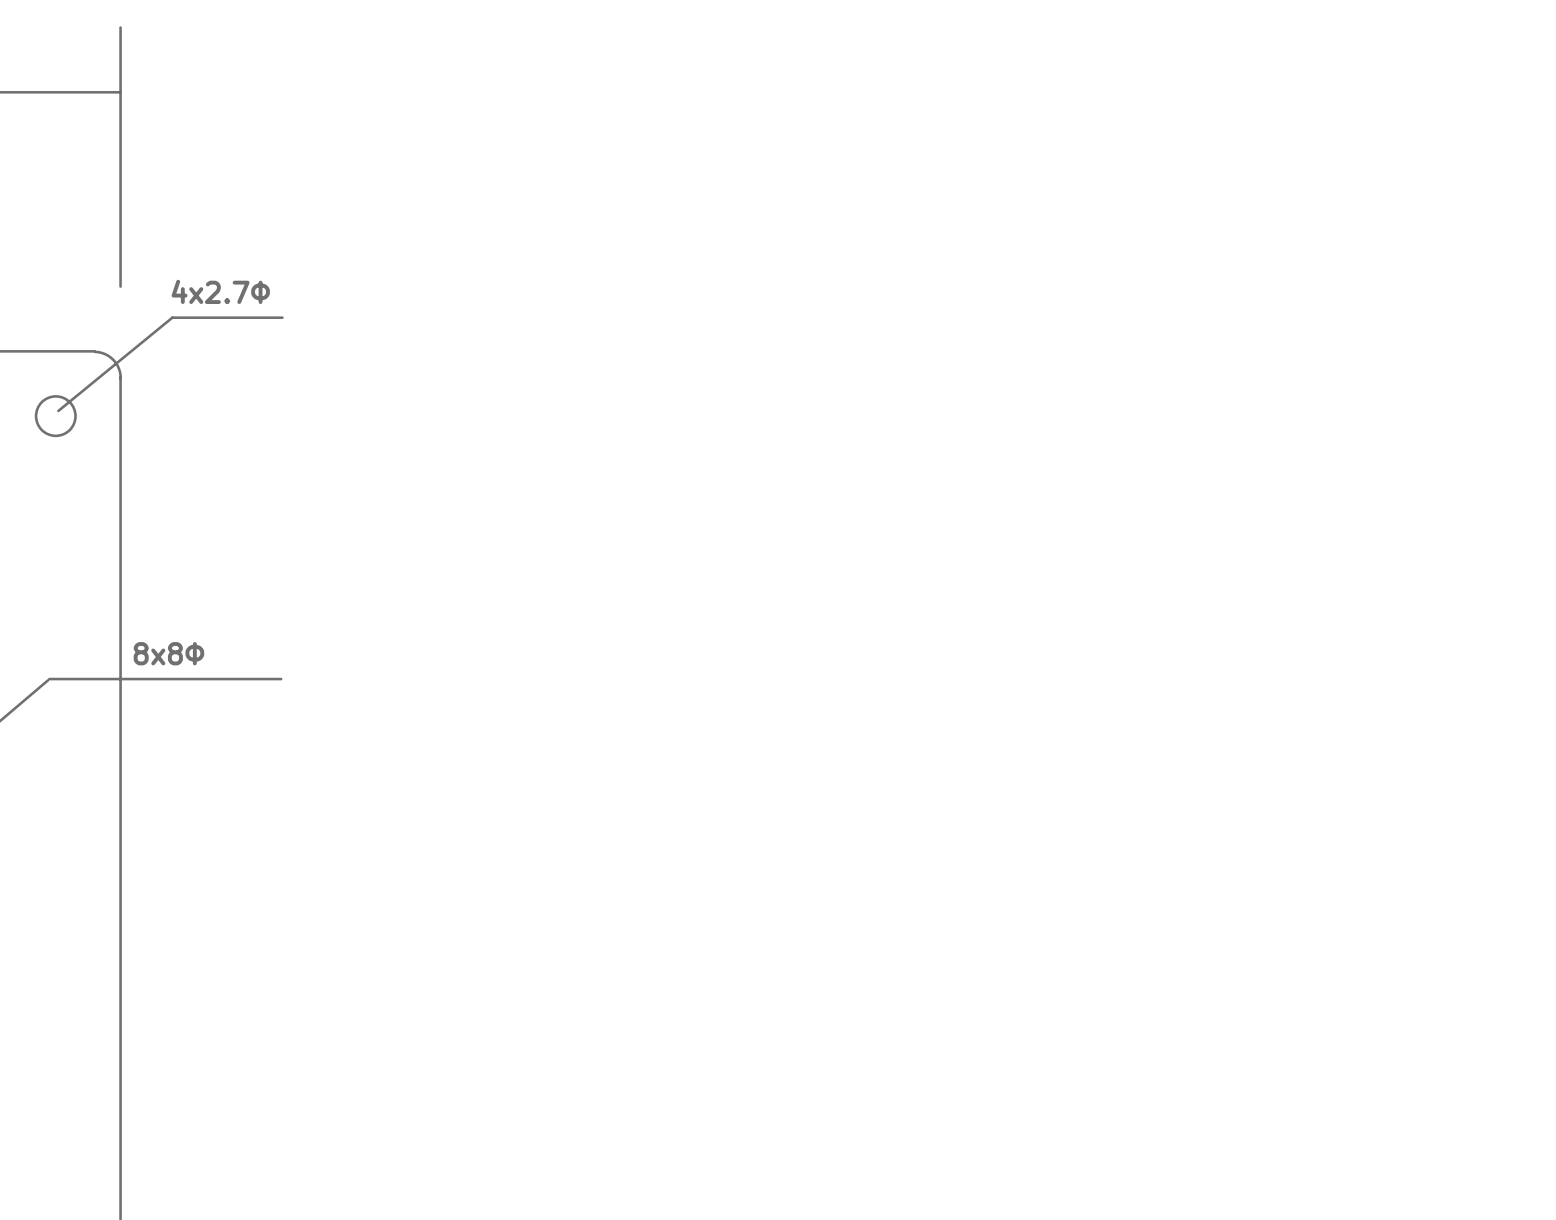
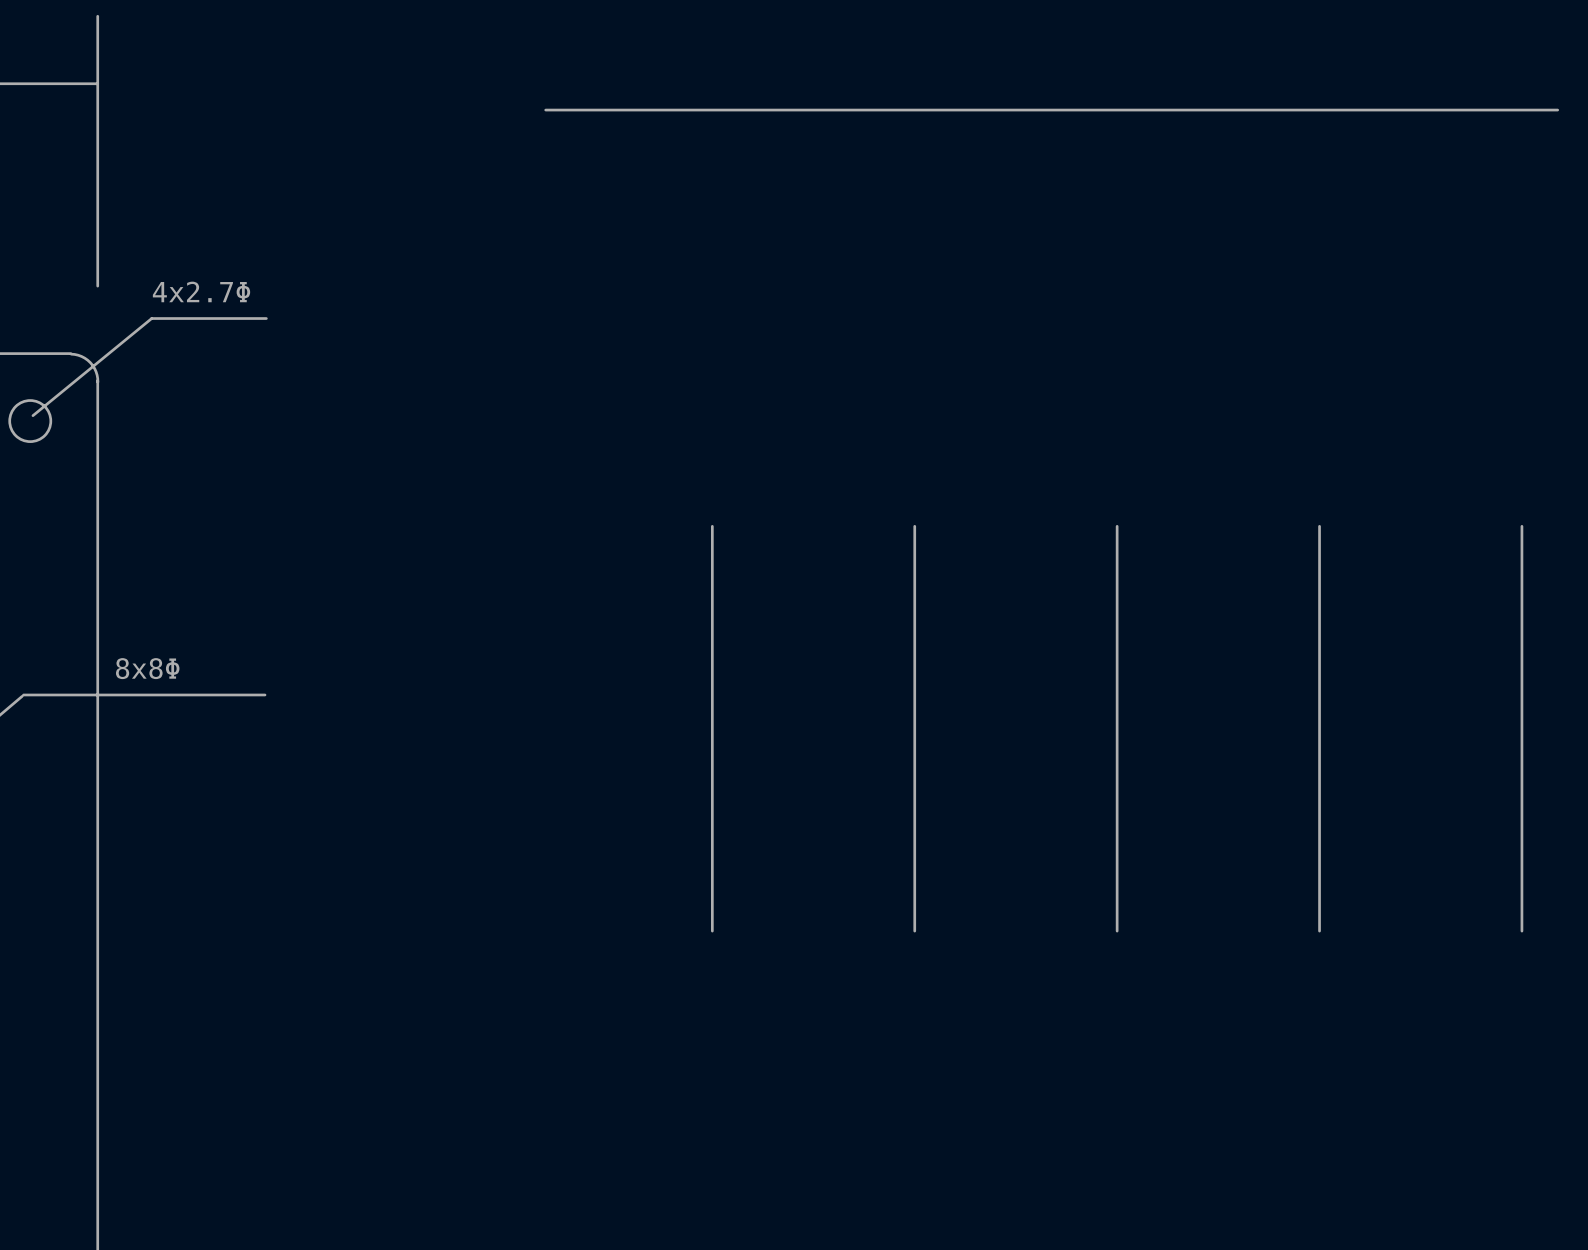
line: none -> (545, 110) (1557, 110)
line: none -> (712, 526) (712, 931)
line: none -> (914, 526) (914, 931)
line: none -> (1117, 526) (1117, 931)
line: none -> (1319, 526) (1319, 931)
line: none -> (1521, 526) (1521, 931)

